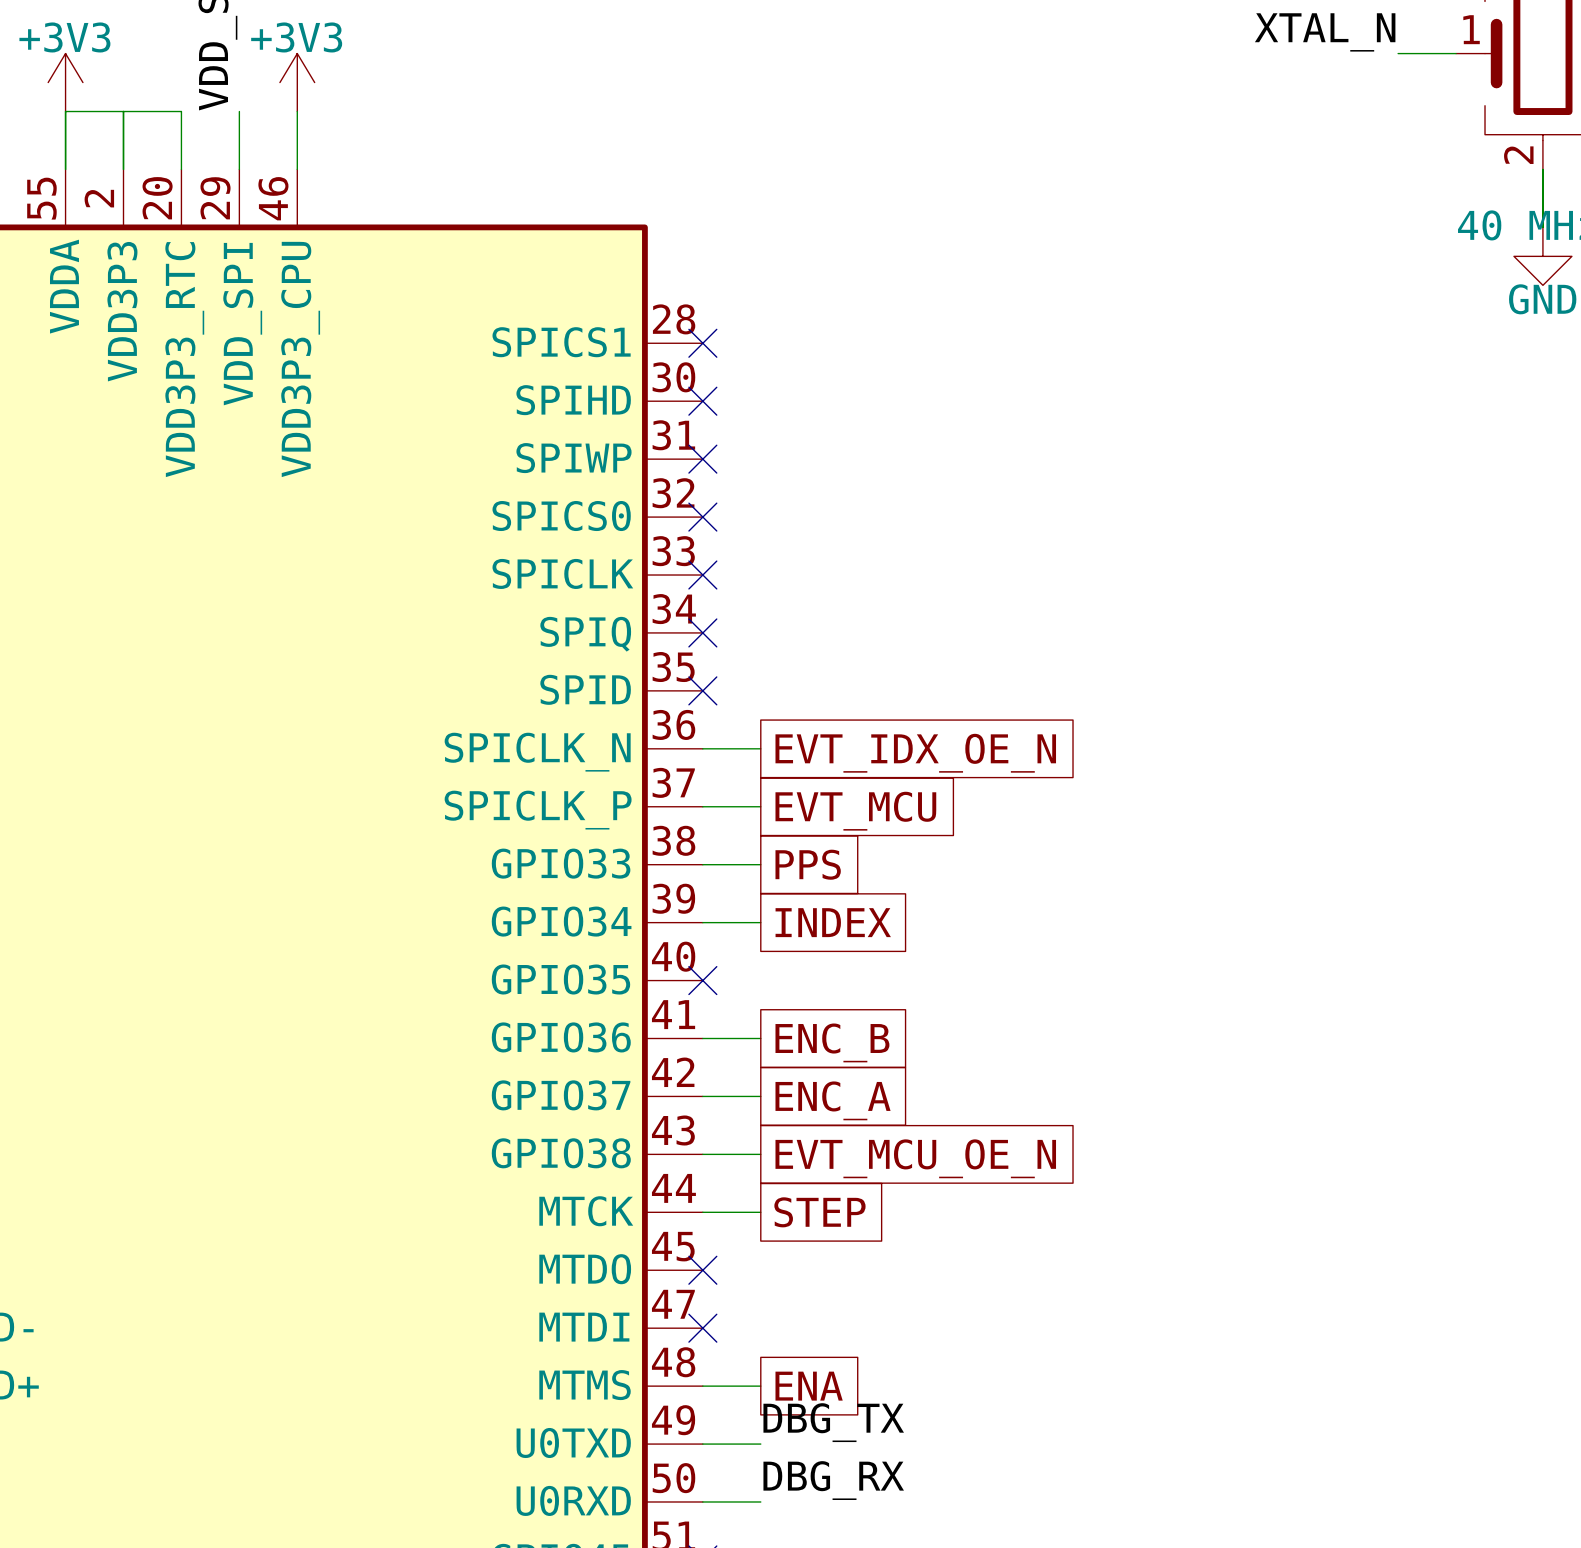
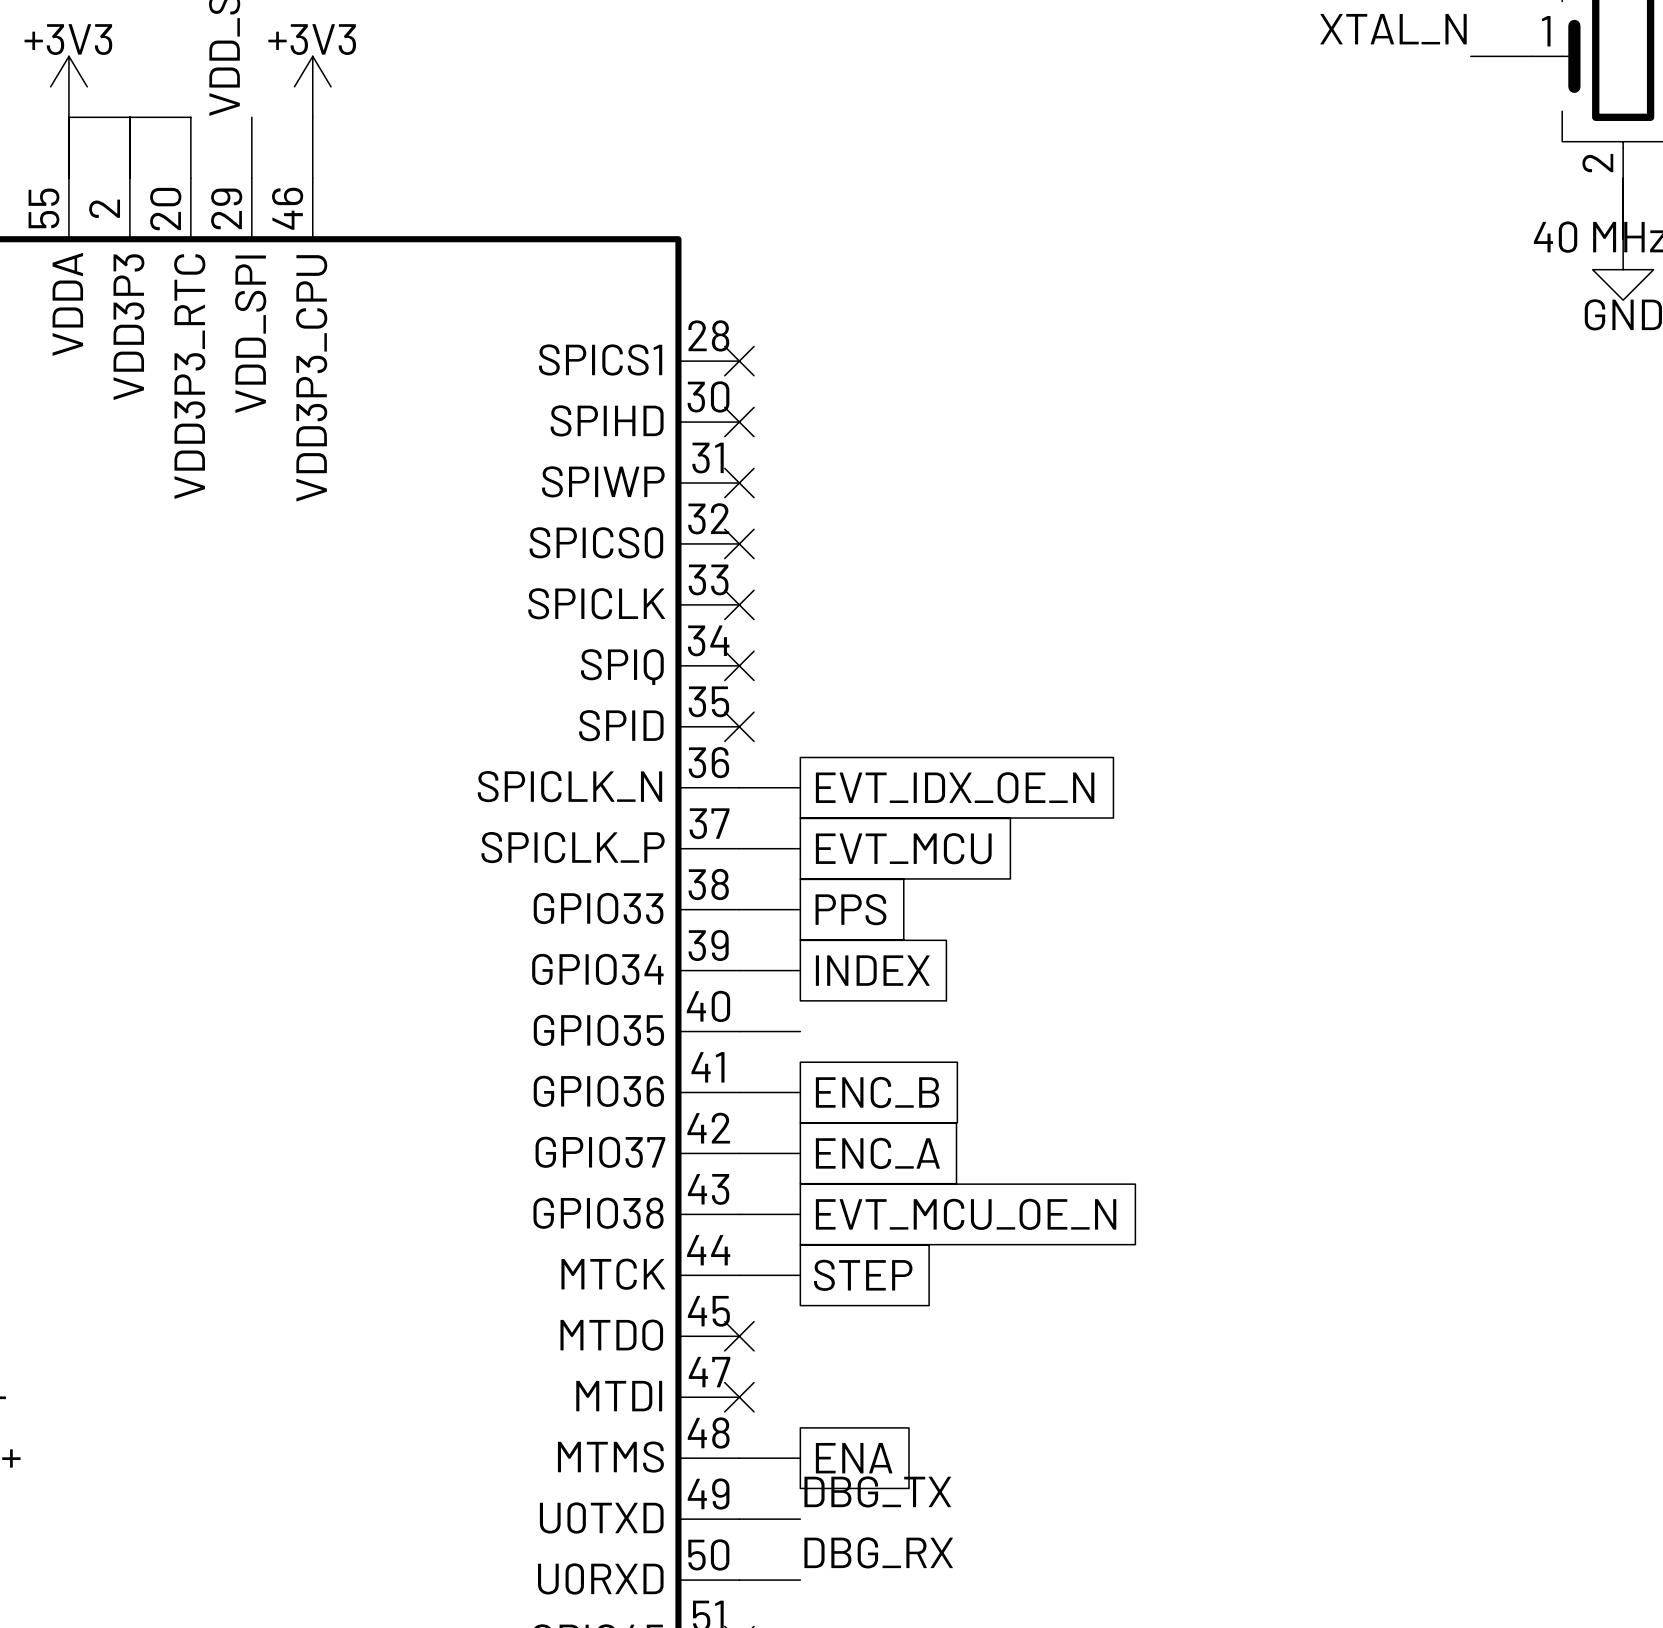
wire: none -> (739, 1031) (800, 1031)
no-connect mark: (702, 980) -> none

